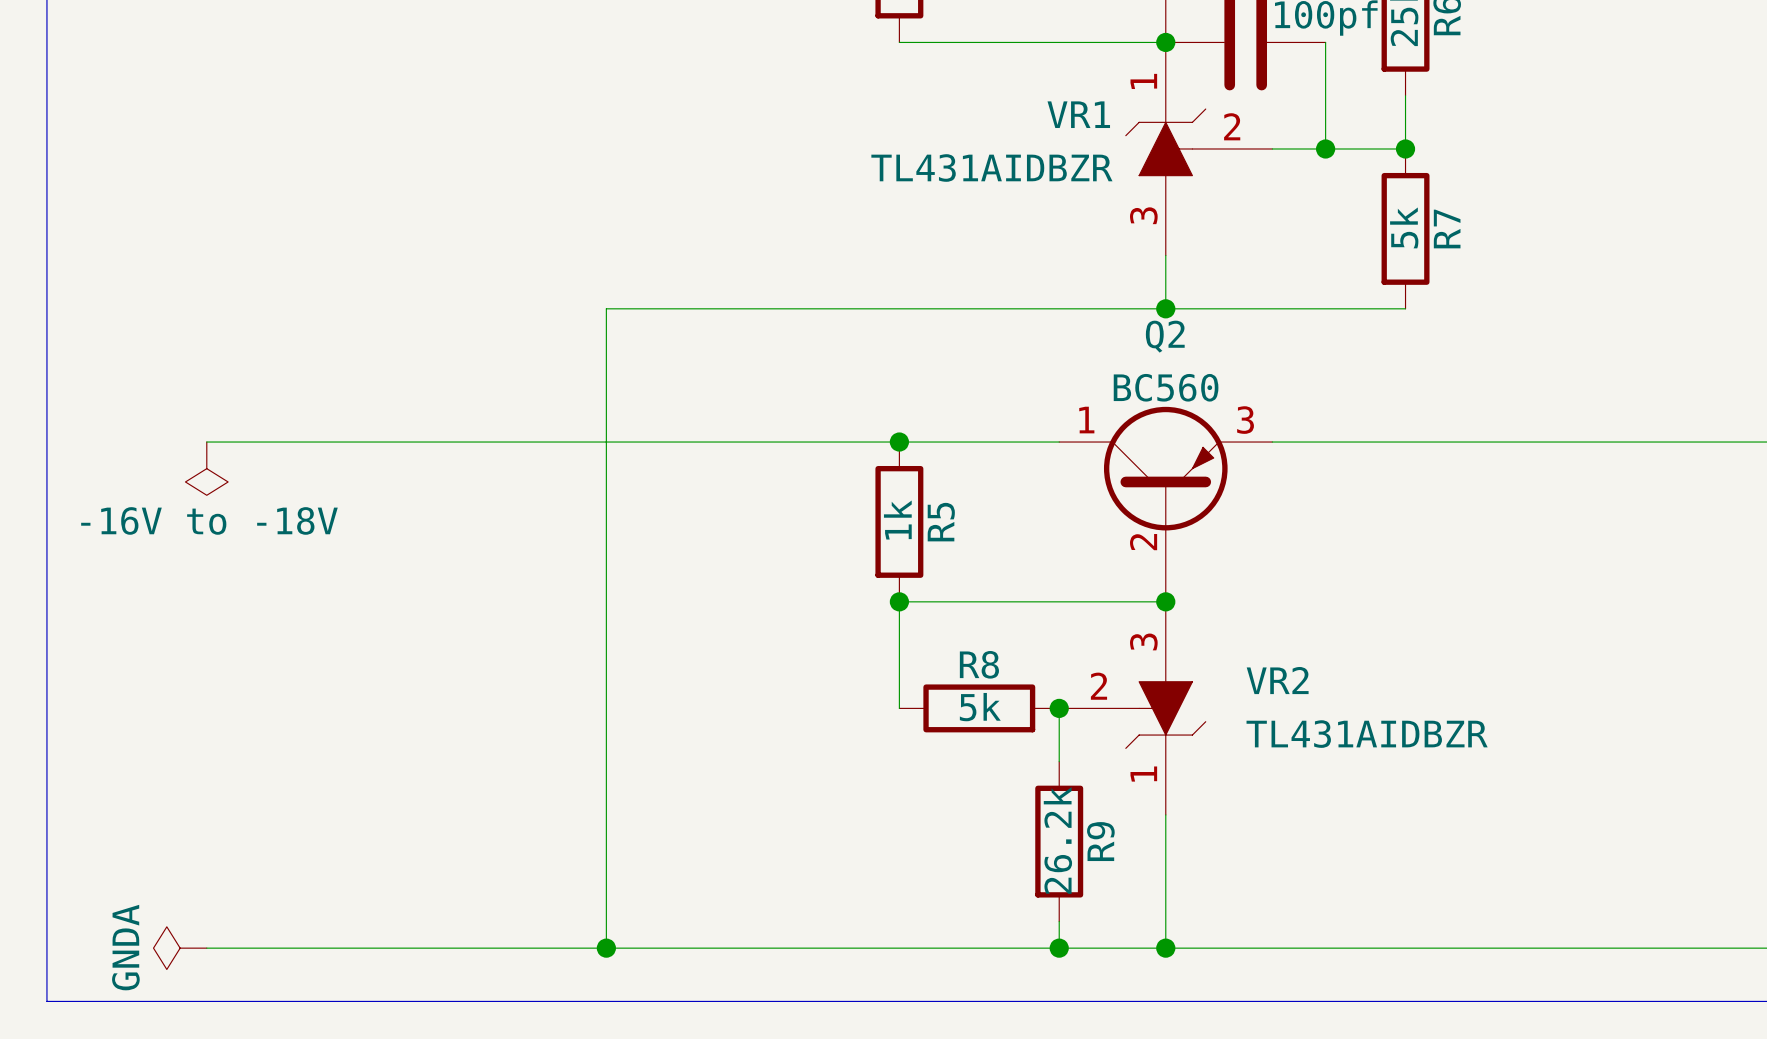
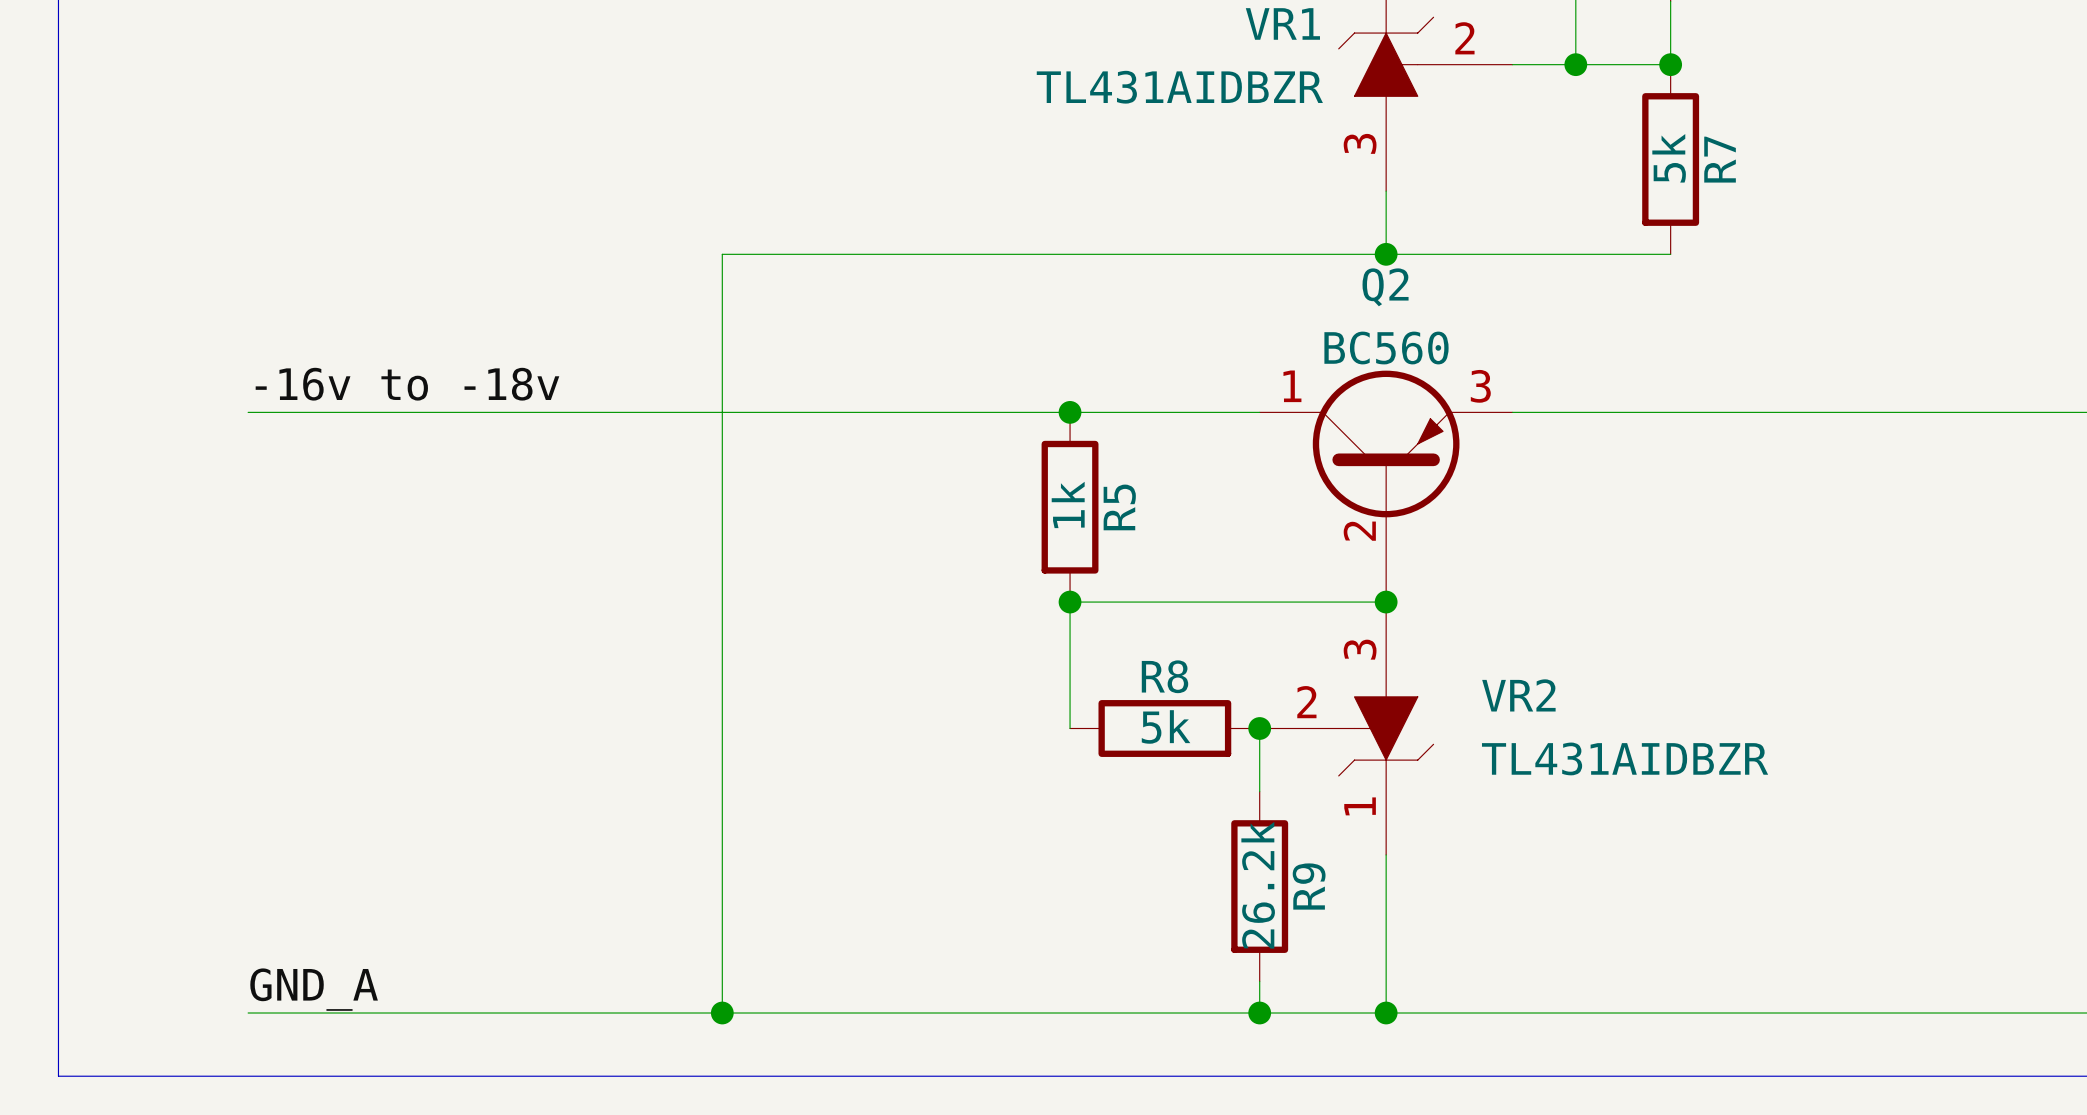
label: none -> -16v to -18v (407, 384)
power symbol: -16V to -18V (206, 468) -> none
label: none -> GND_A (314, 989)
power symbol: GNDA (180, 948) -> none

